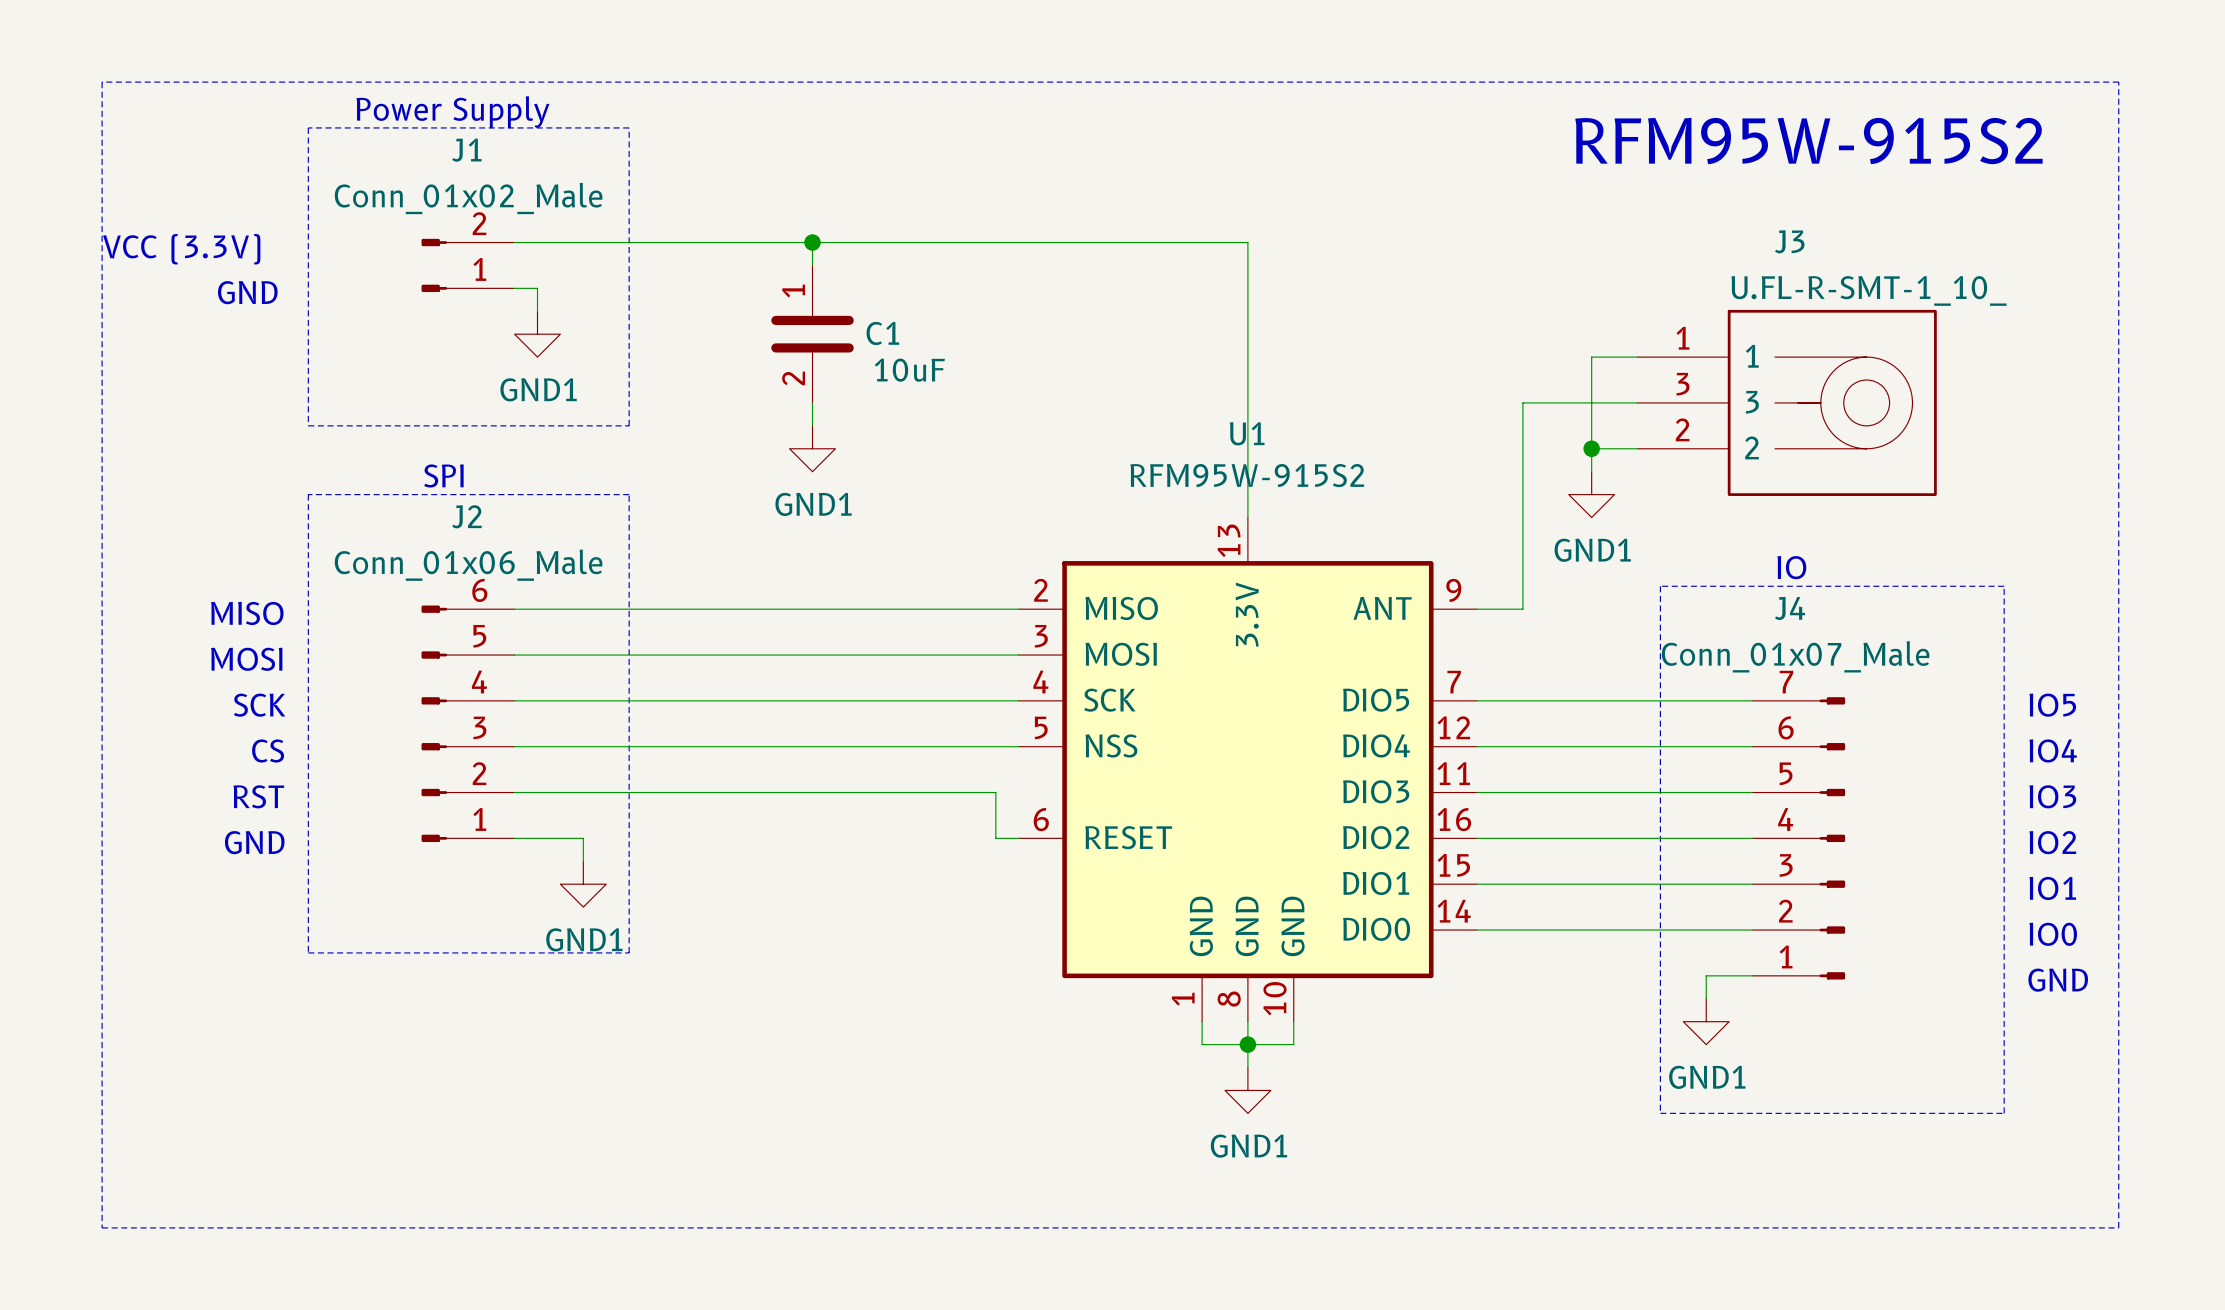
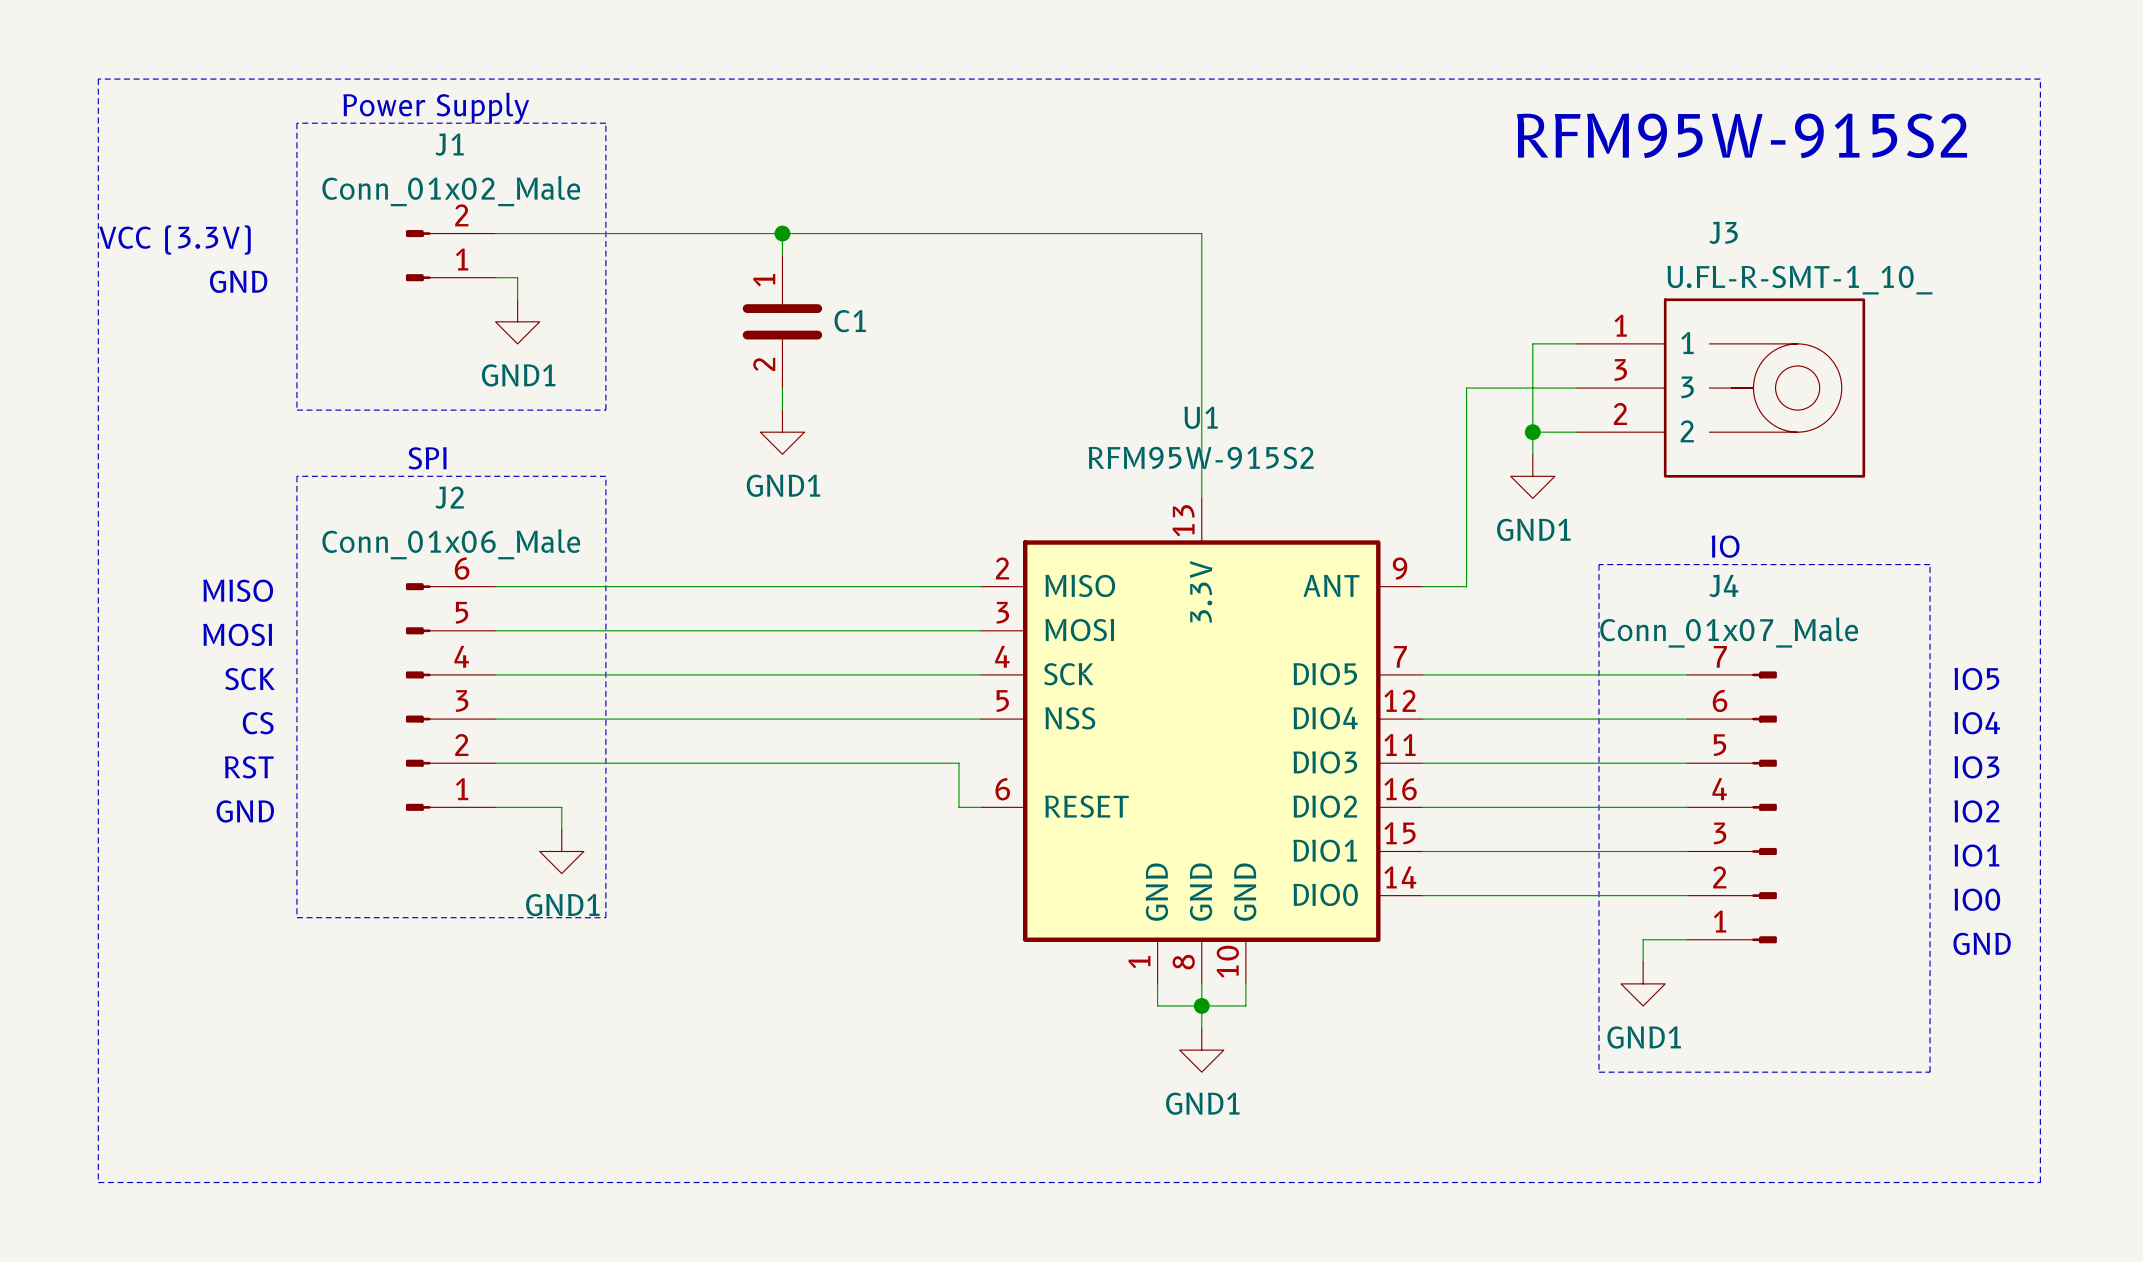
C1 value: 10uF (909, 370) -> none

